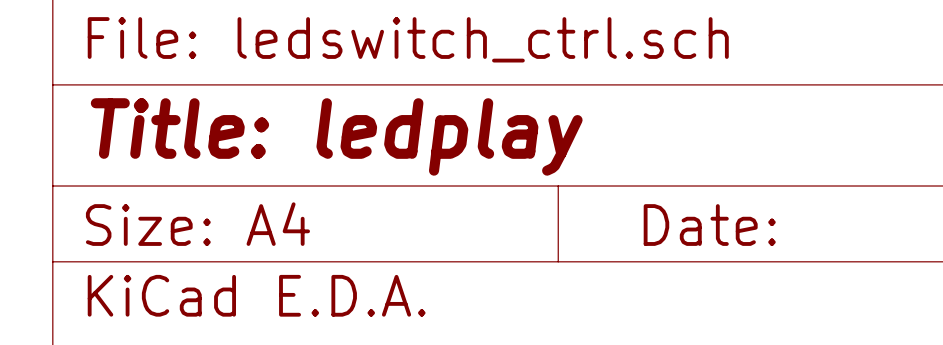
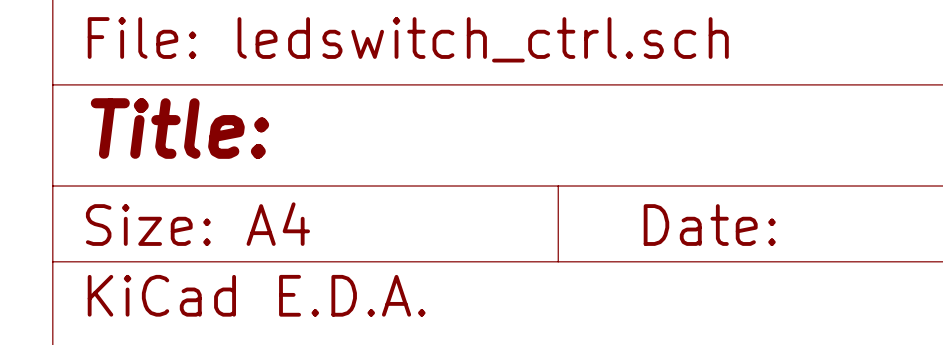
title block: Title: ledplay (336, 136) -> Title: (179, 128)

